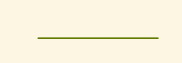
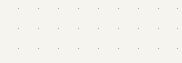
wire: (38, 38) (158, 38) -> none

